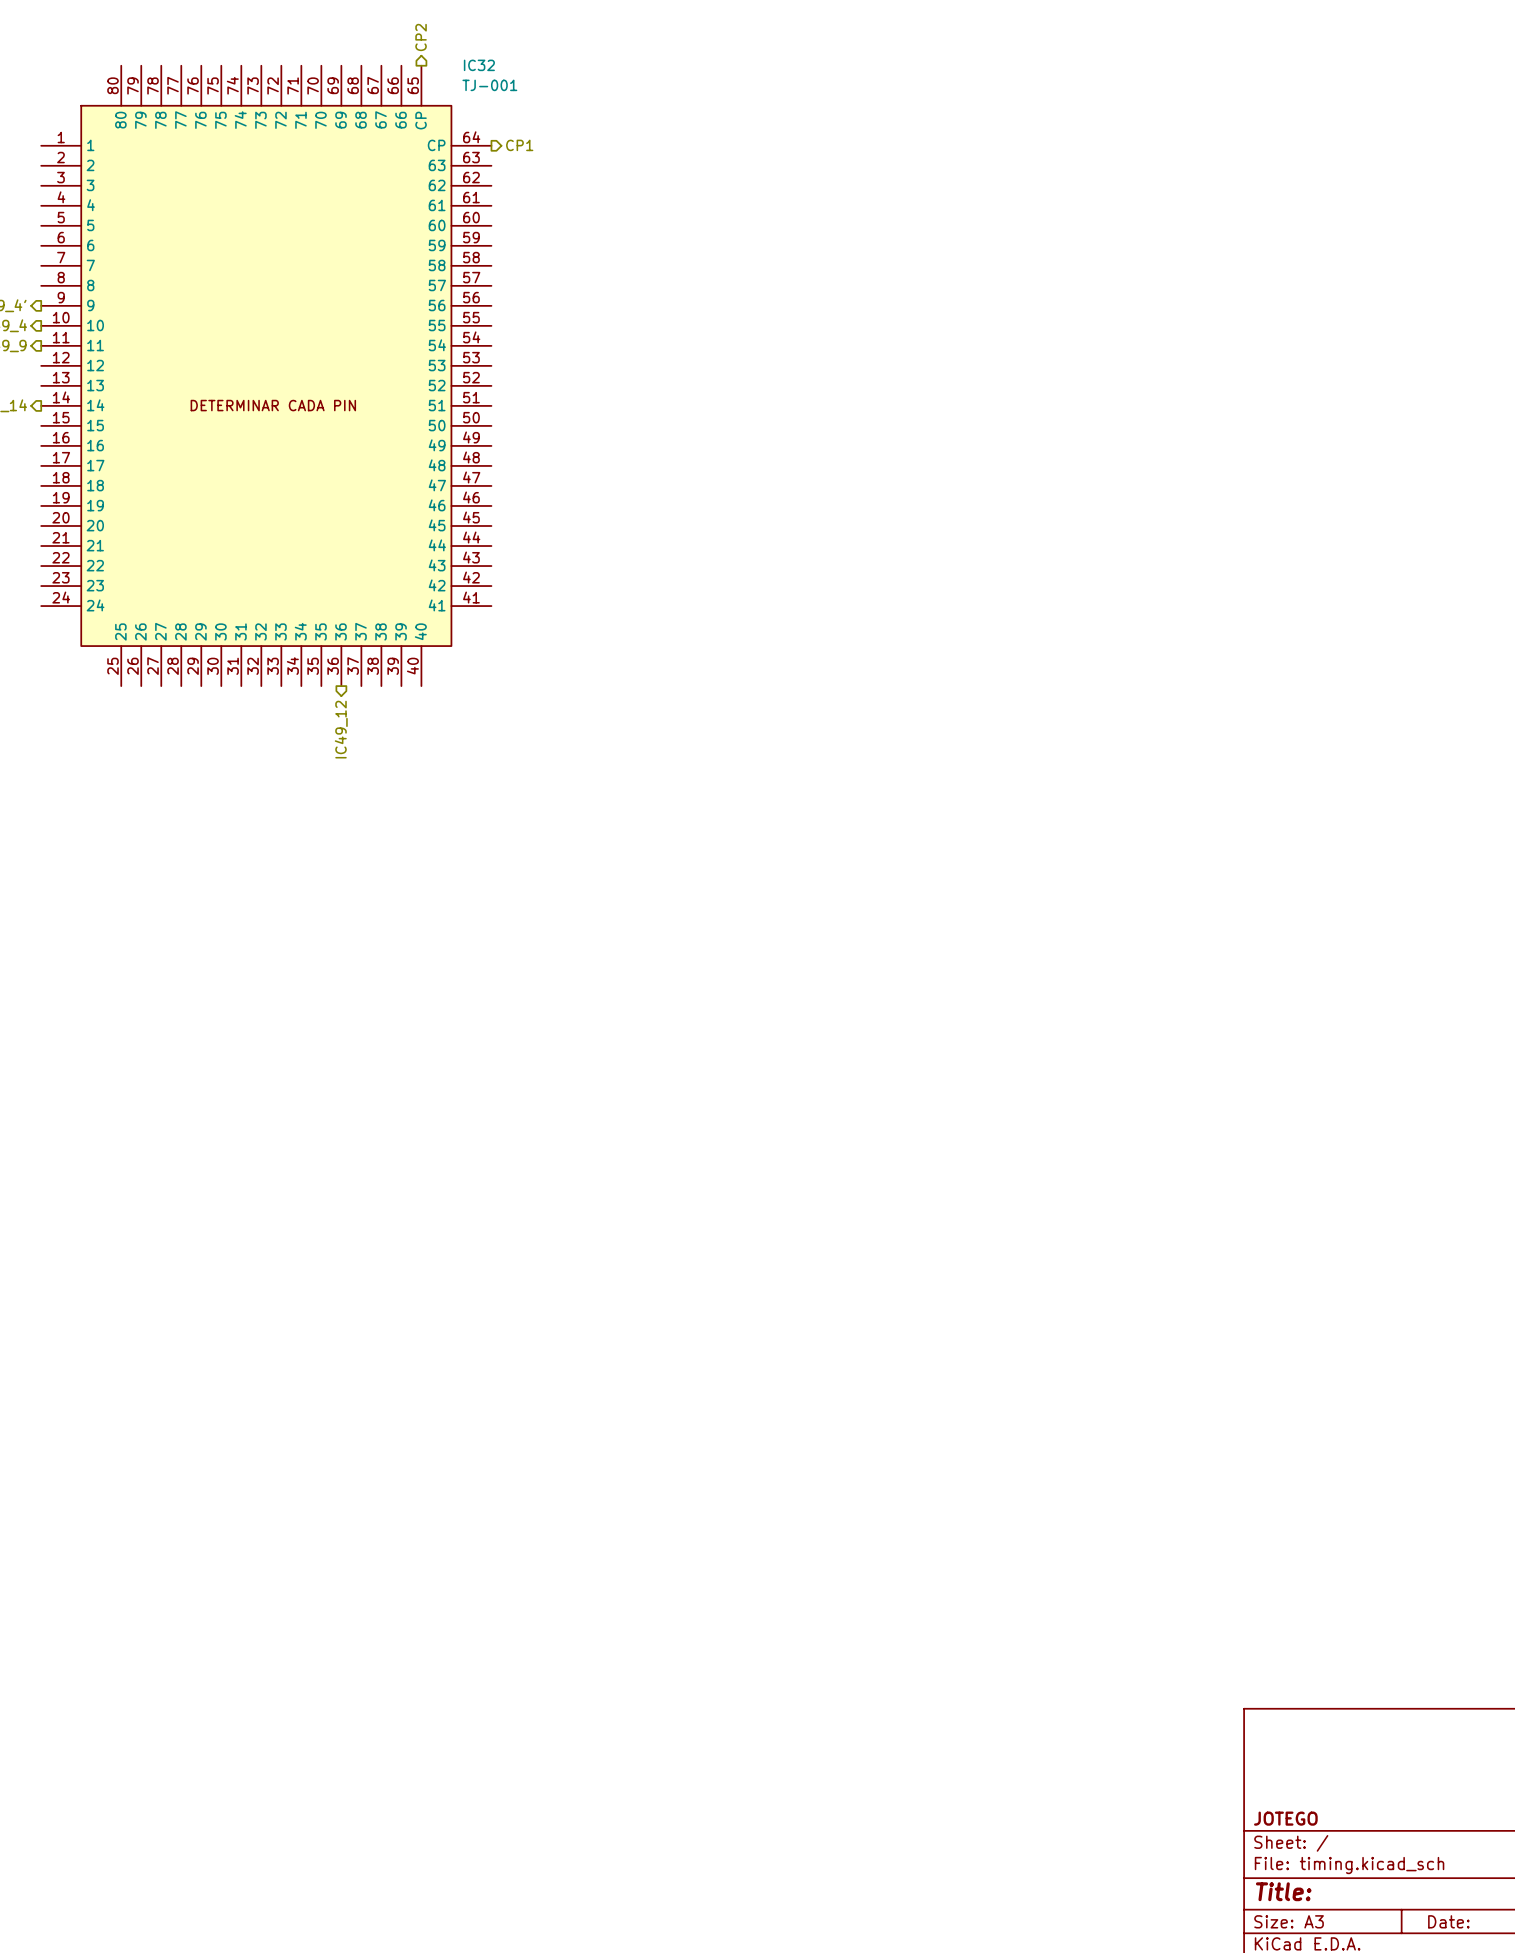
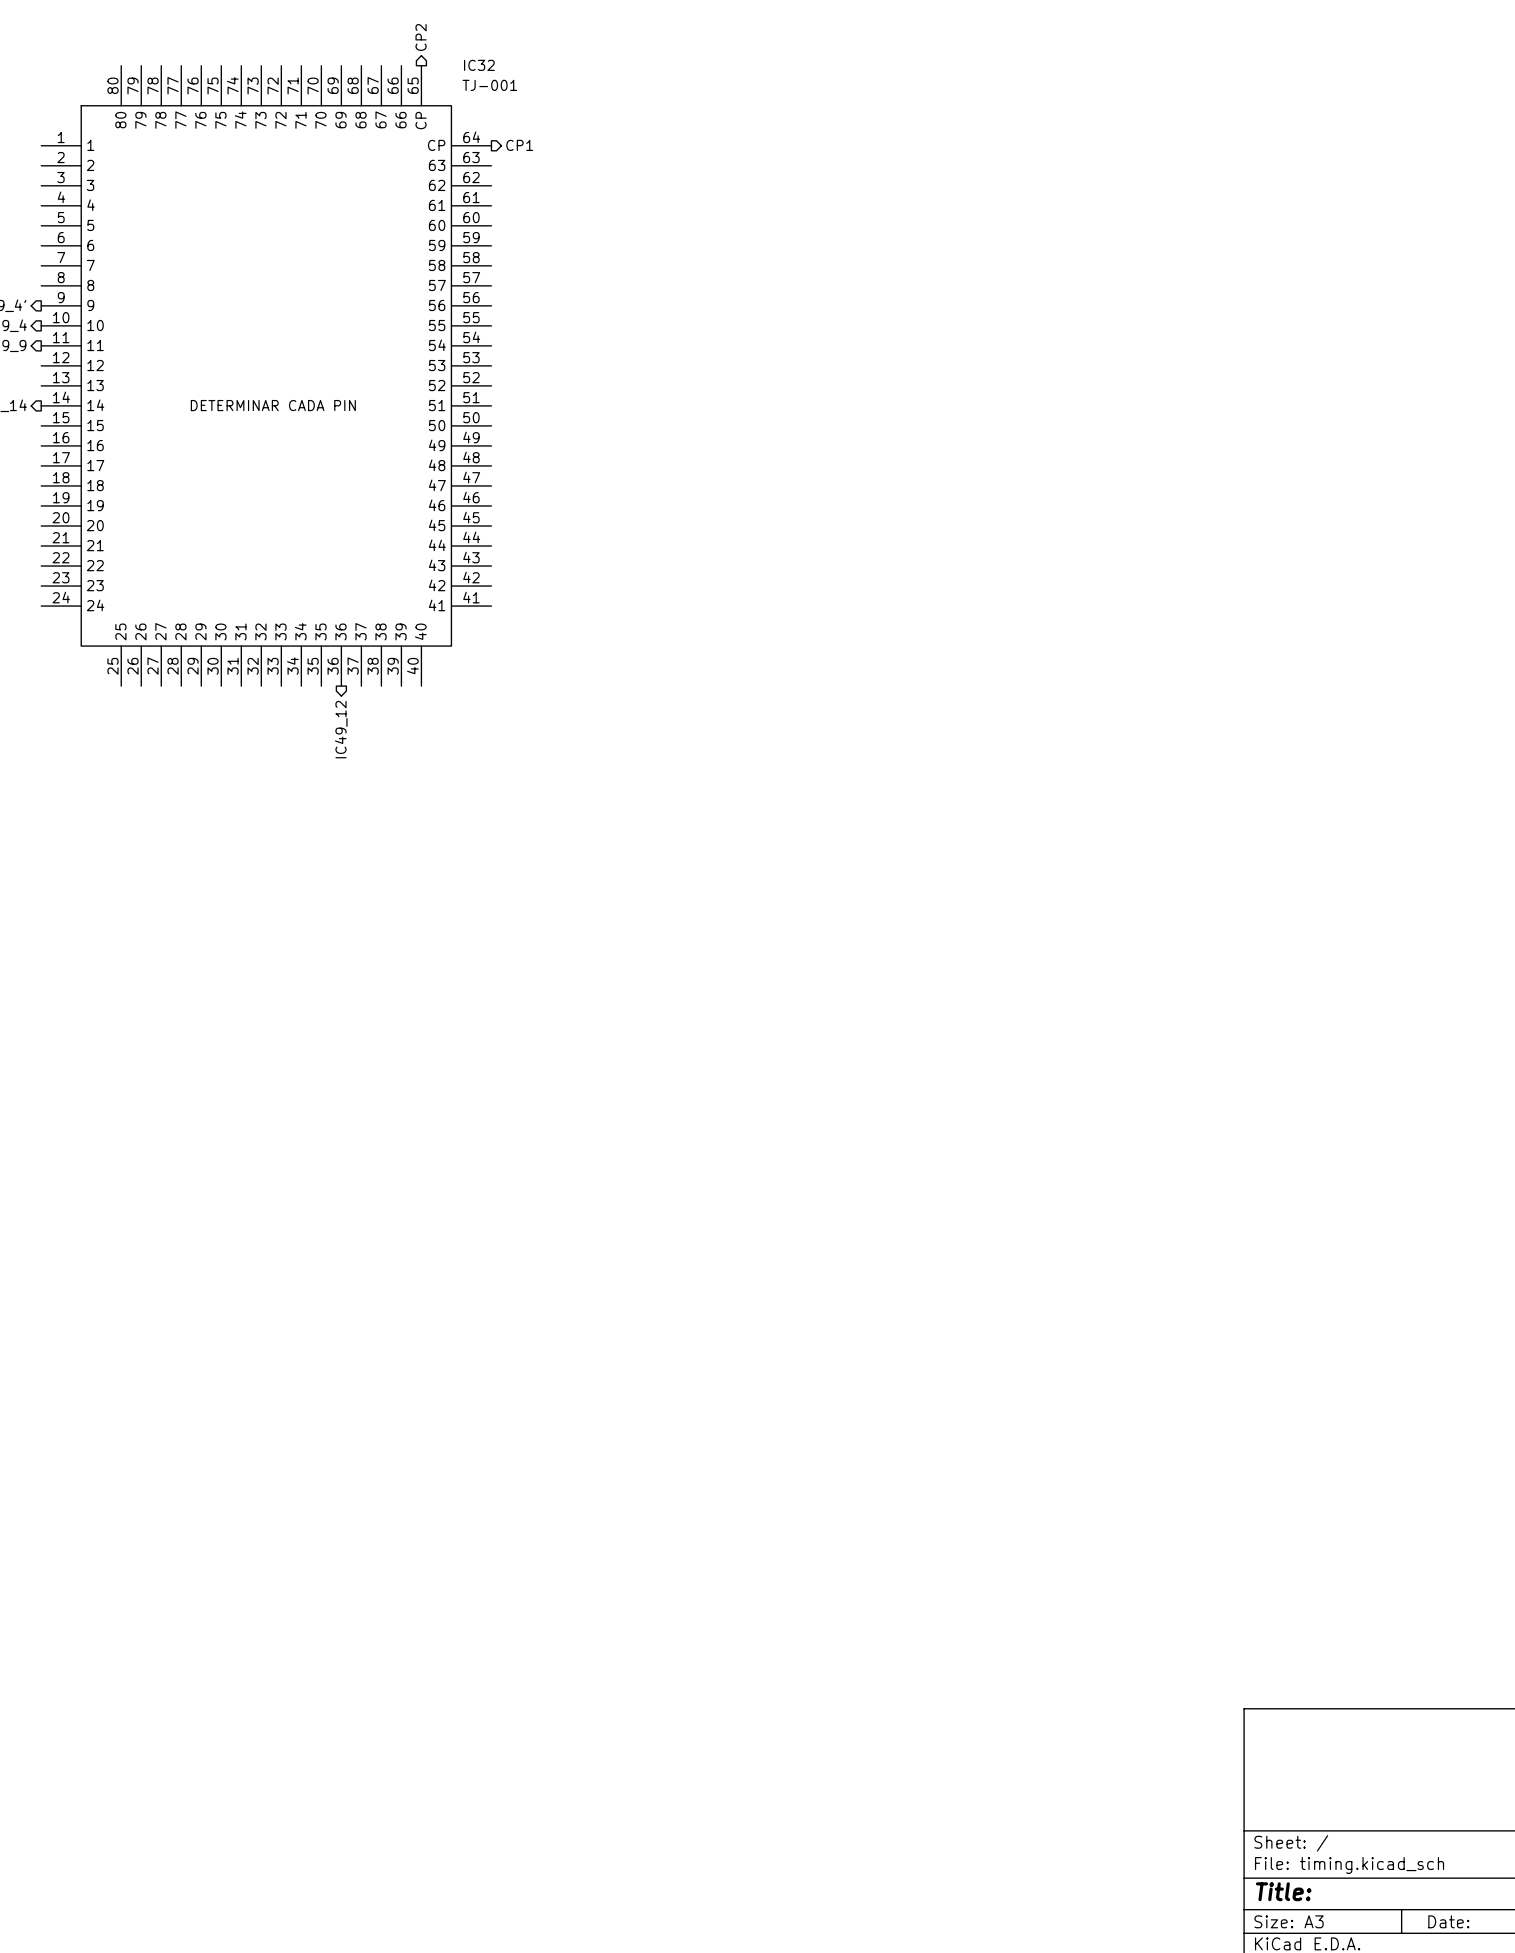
title block: JOTEGO (1285, 1818) -> none

